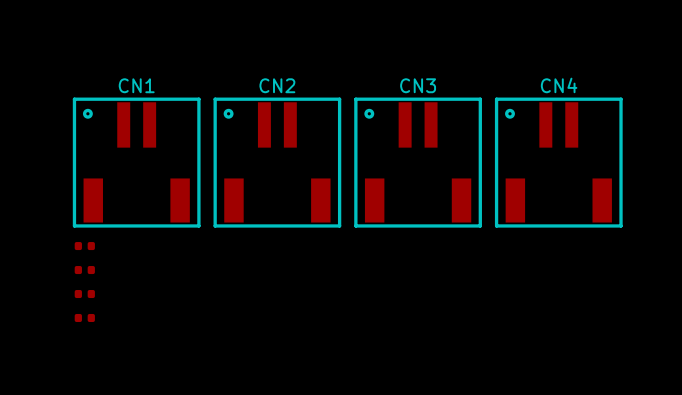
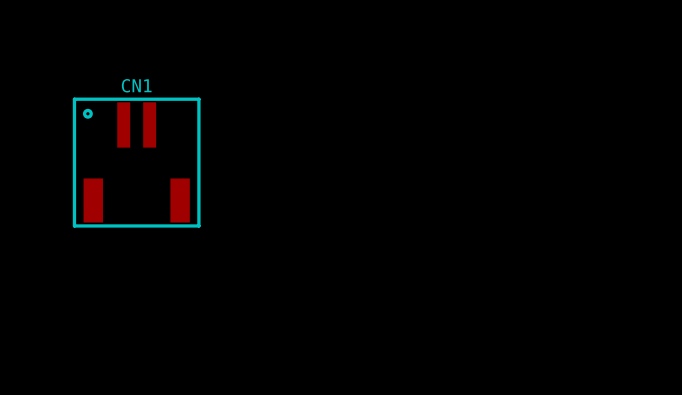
CN2: (277, 162) -> none
CN3: (418, 162) -> none
CN4: (558, 162) -> none
part: (84, 246) -> none
part: (84, 270) -> none
part: (84, 294) -> none
part: (84, 317) -> none

